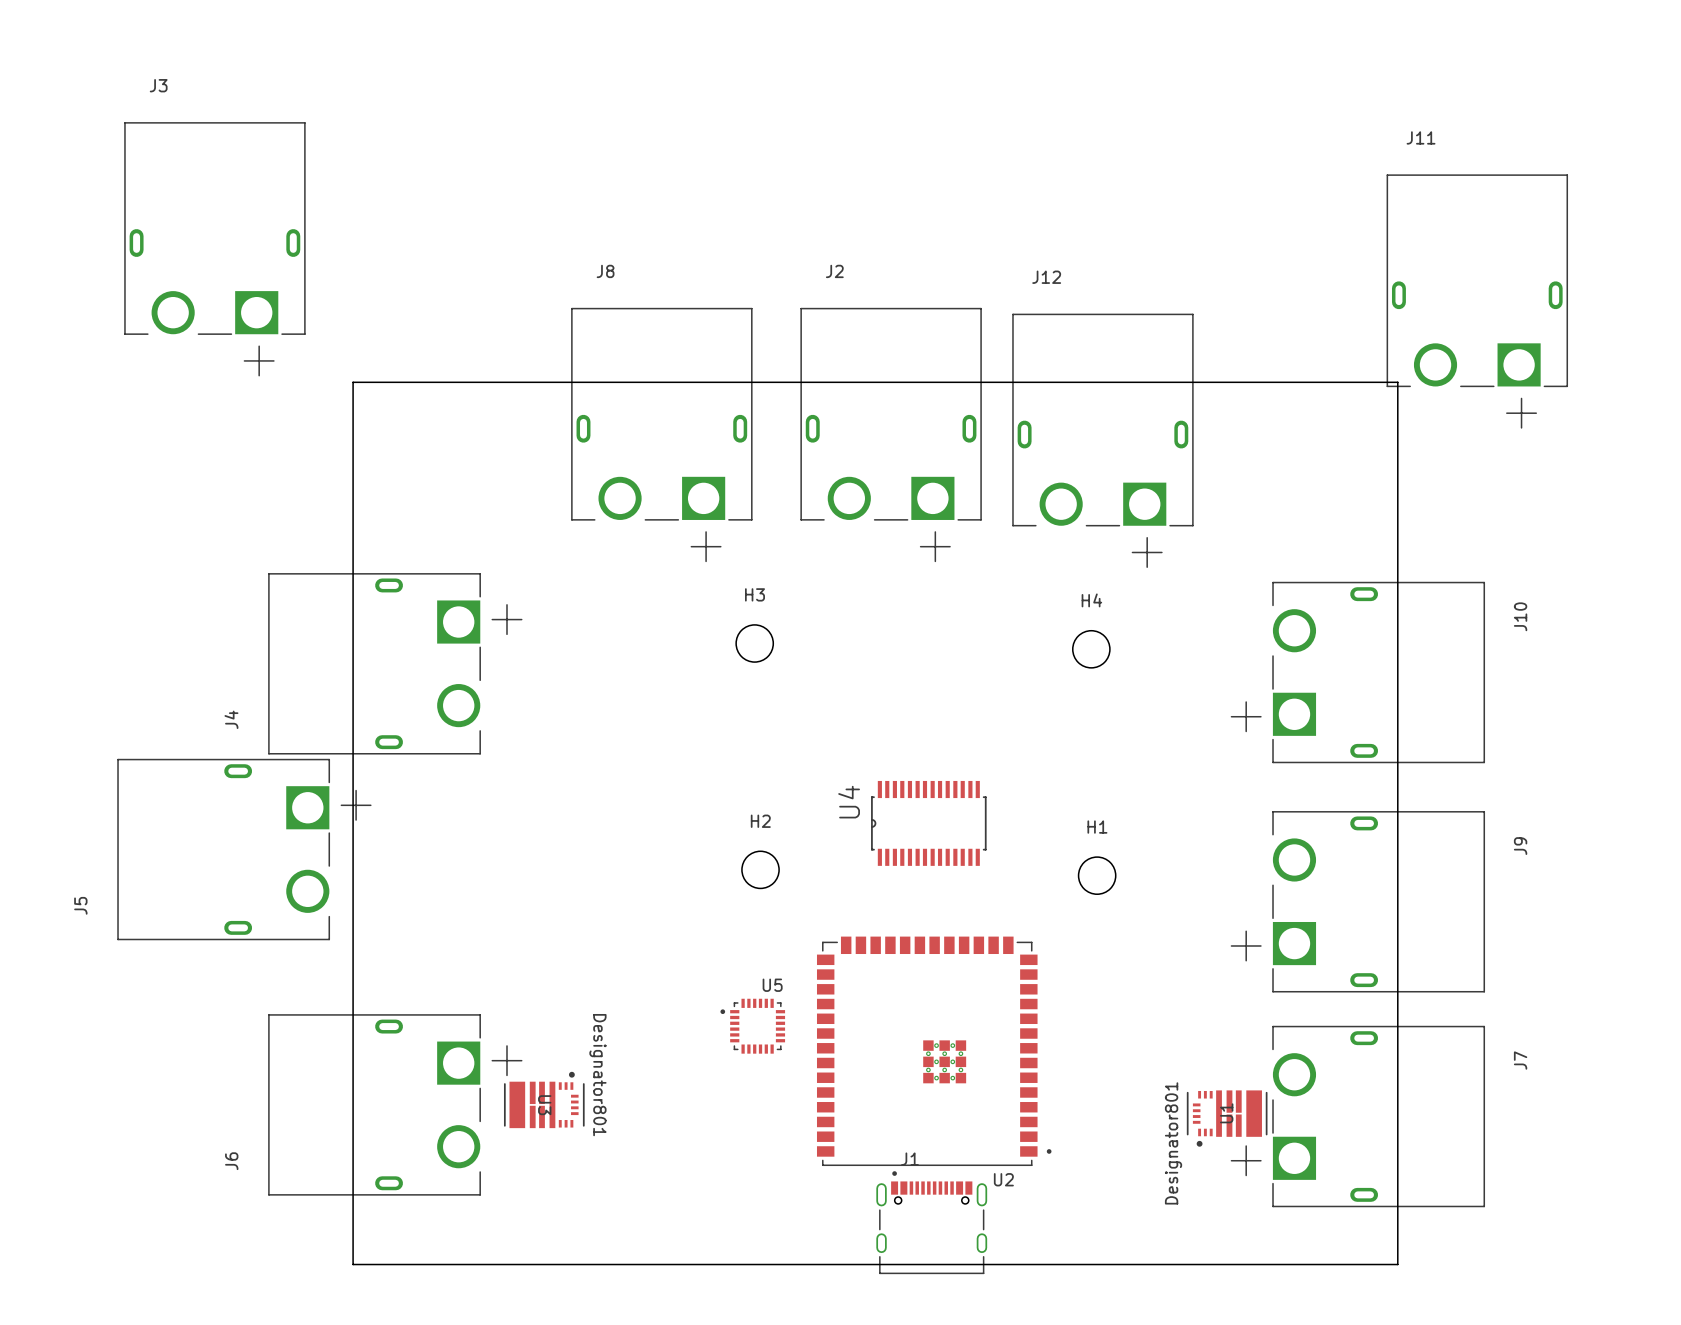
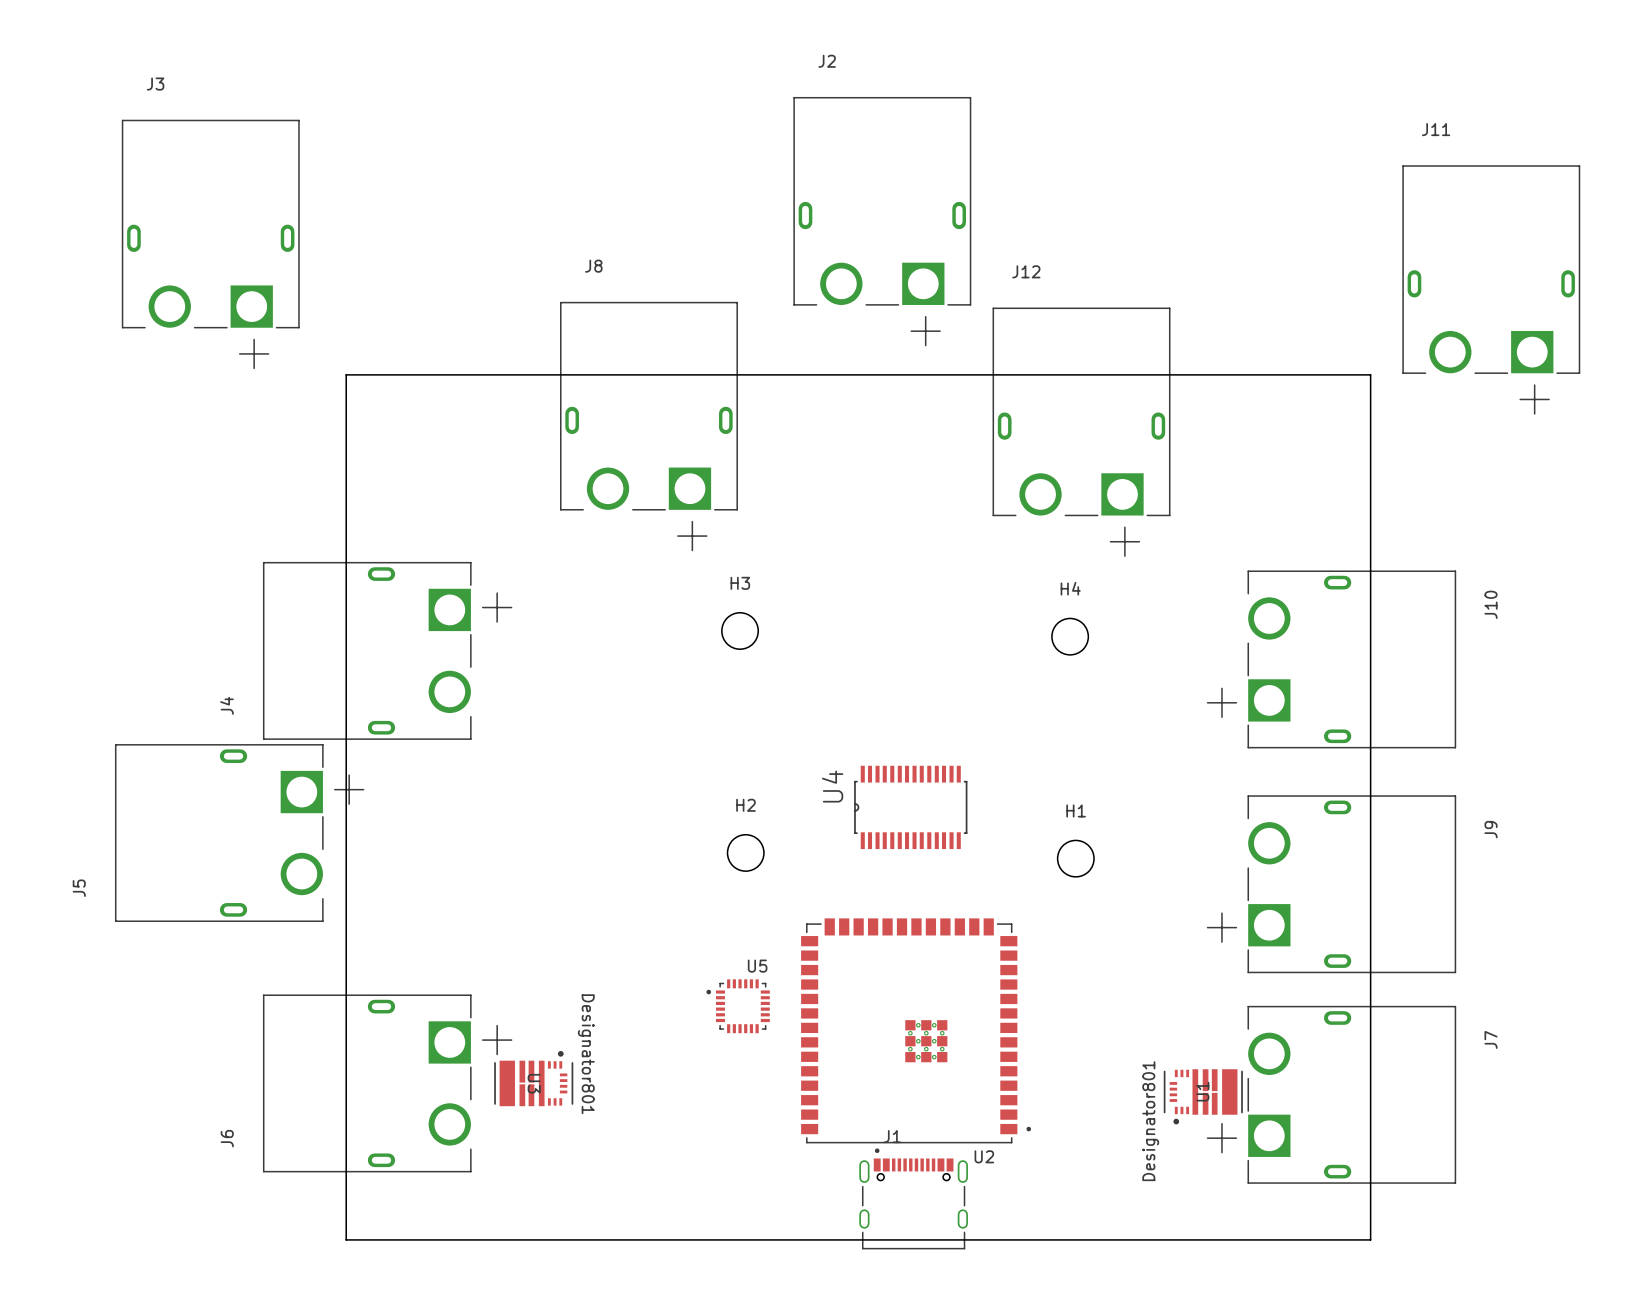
J11 position: (1477, 301) -> (1491, 289)
J2 position: (891, 435) -> (882, 221)

